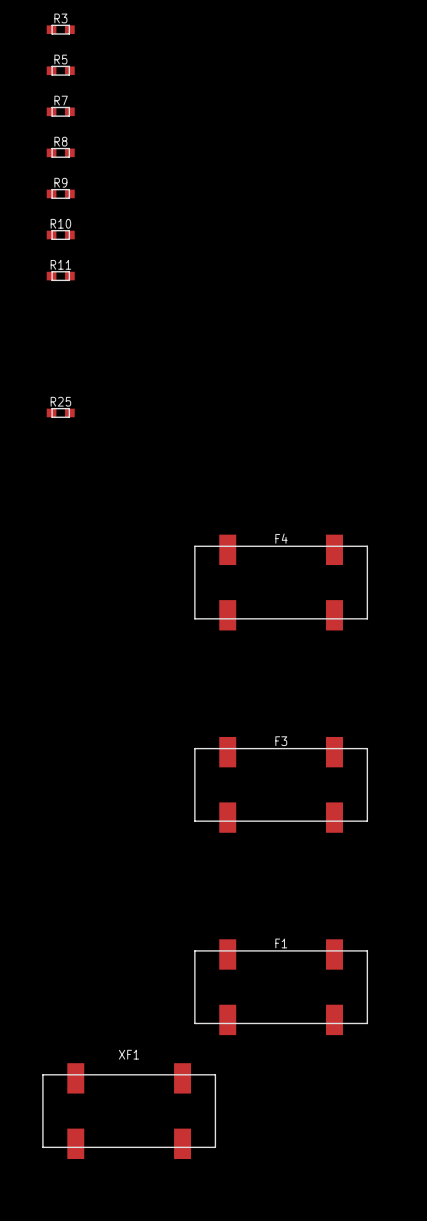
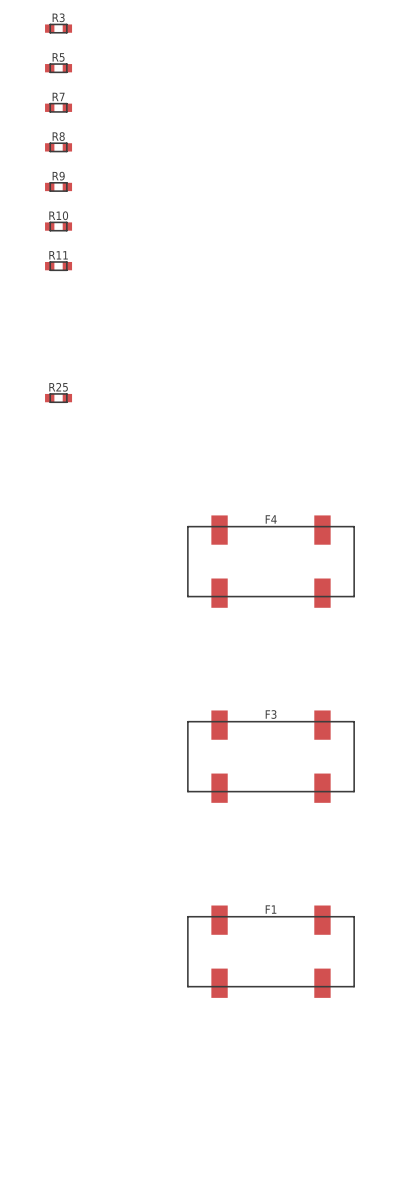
XF1: (129, 1111) -> none

